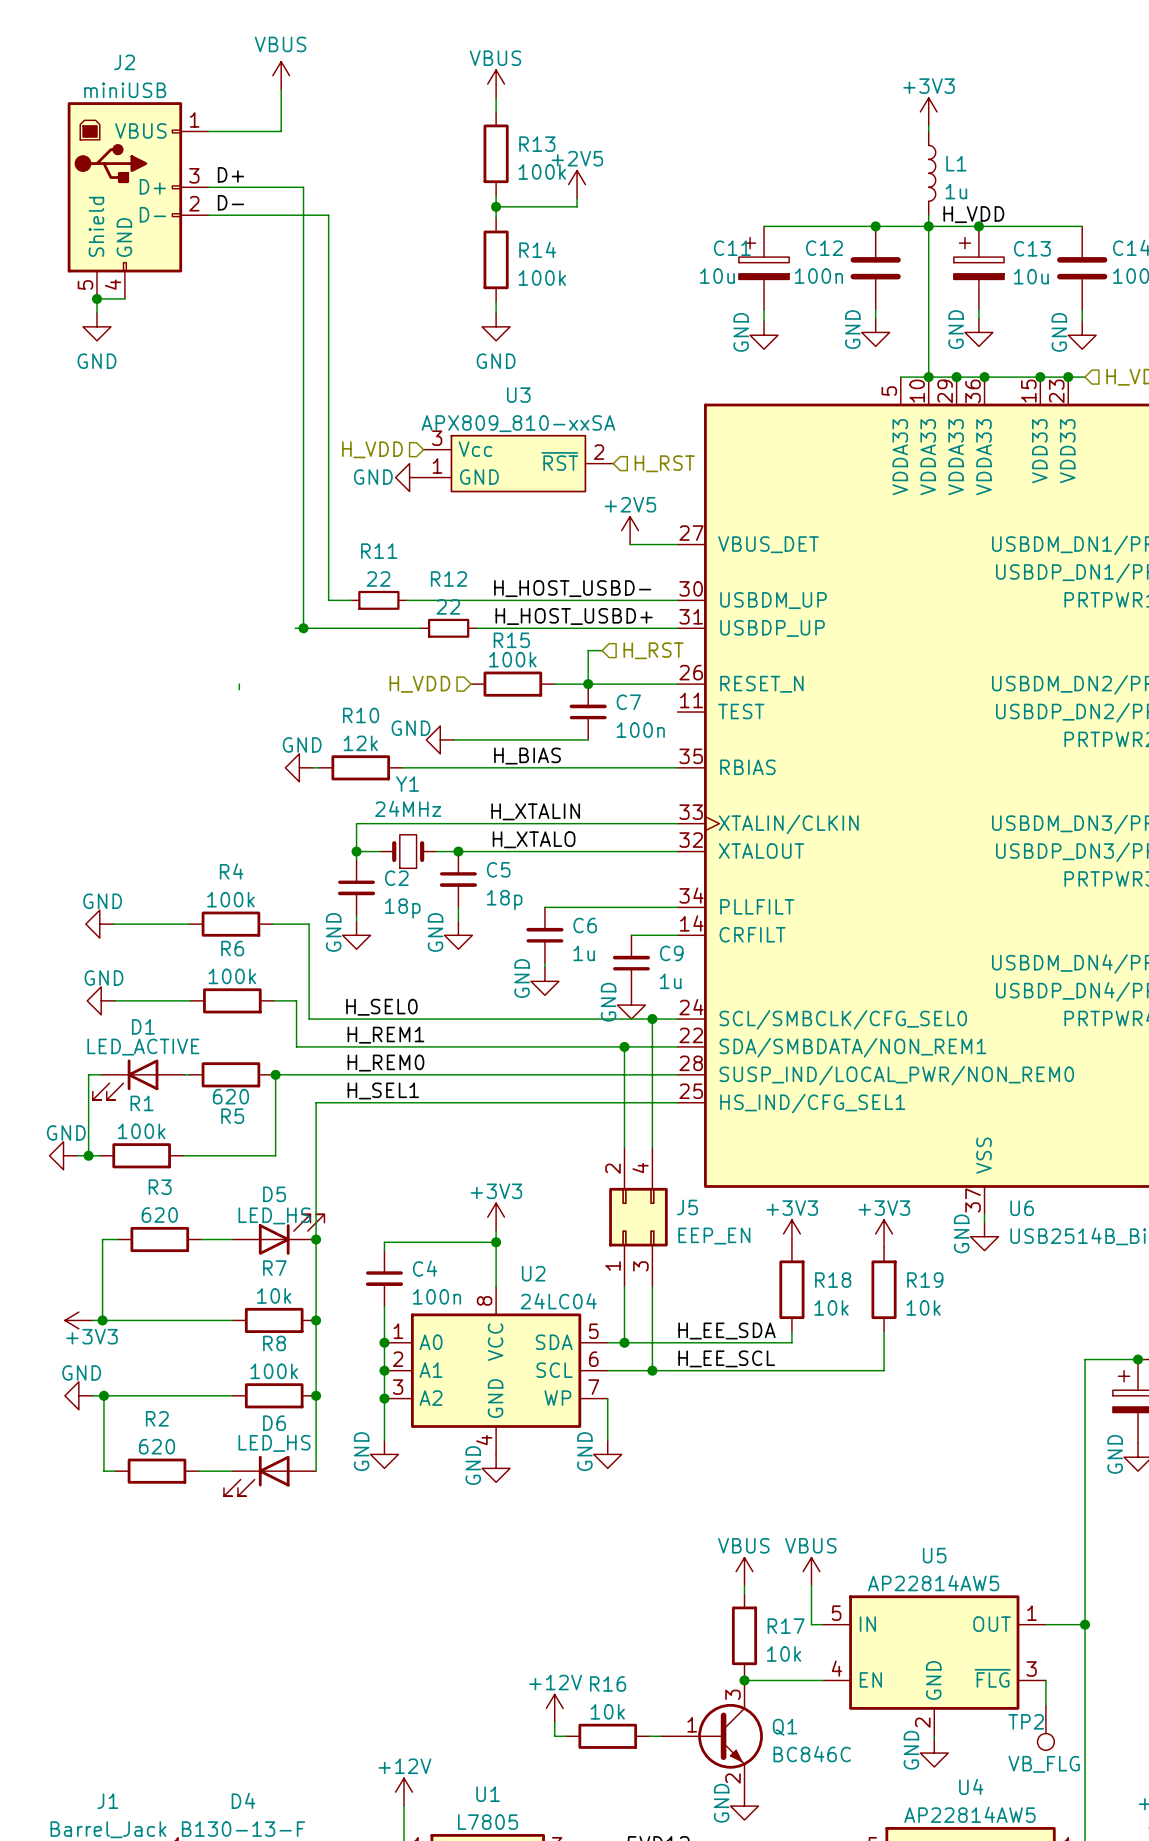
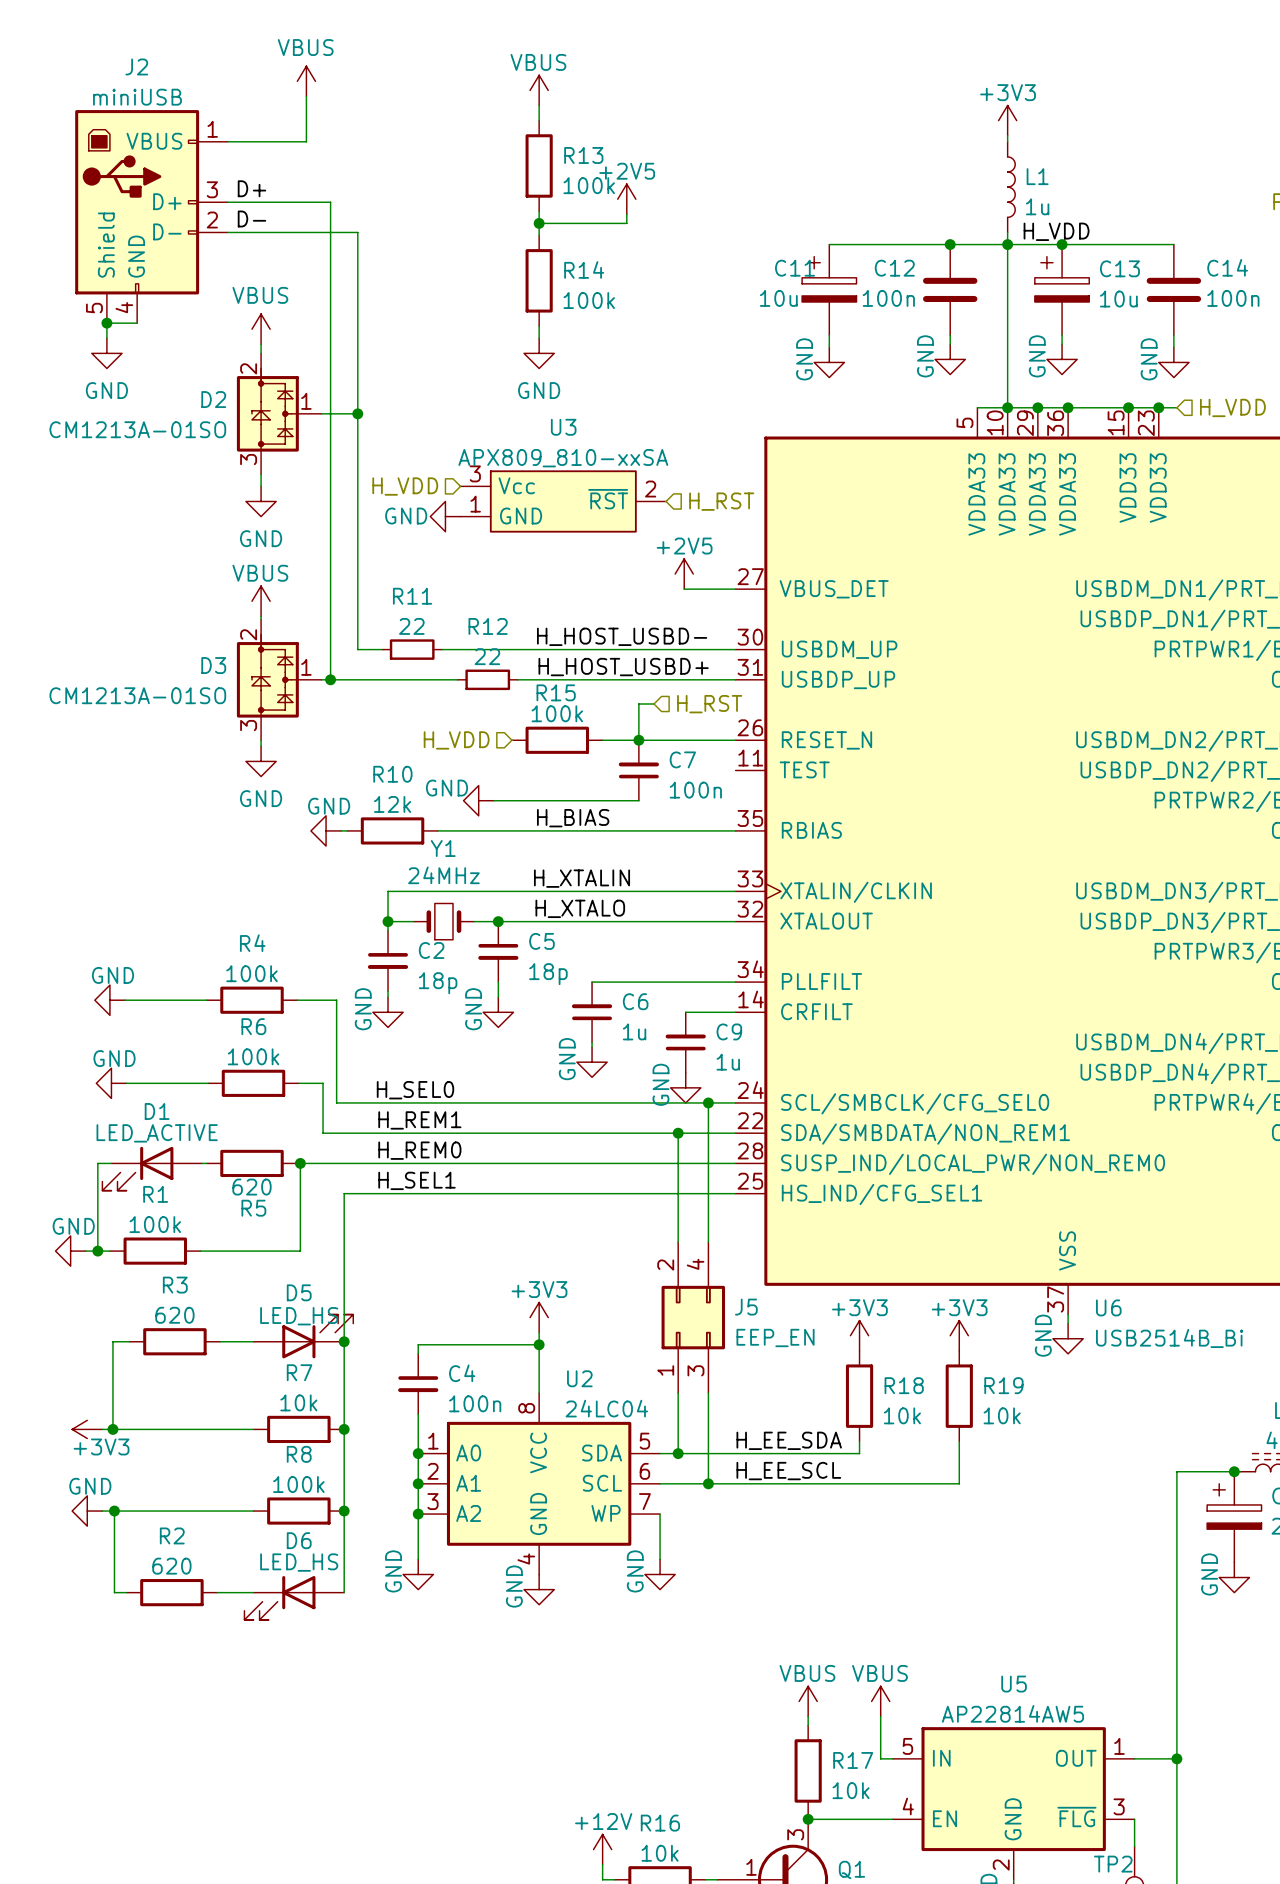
power symbol: none -> VBUS (261, 329)
wire: none -> (261, 344) (261, 353)
D2: none -> CM1213A-01SO (279, 413)
wire: none -> (321, 413) (357, 413)
junction: none -> (357, 413)
wire: none -> (261, 474) (261, 486)
power symbol: none -> GND (261, 501)
power symbol: none -> VBUS (261, 601)
wire: none -> (261, 616) (261, 619)
D3: none -> CM1213A-01SO (279, 679)
power symbol: none -> GND (261, 761)

